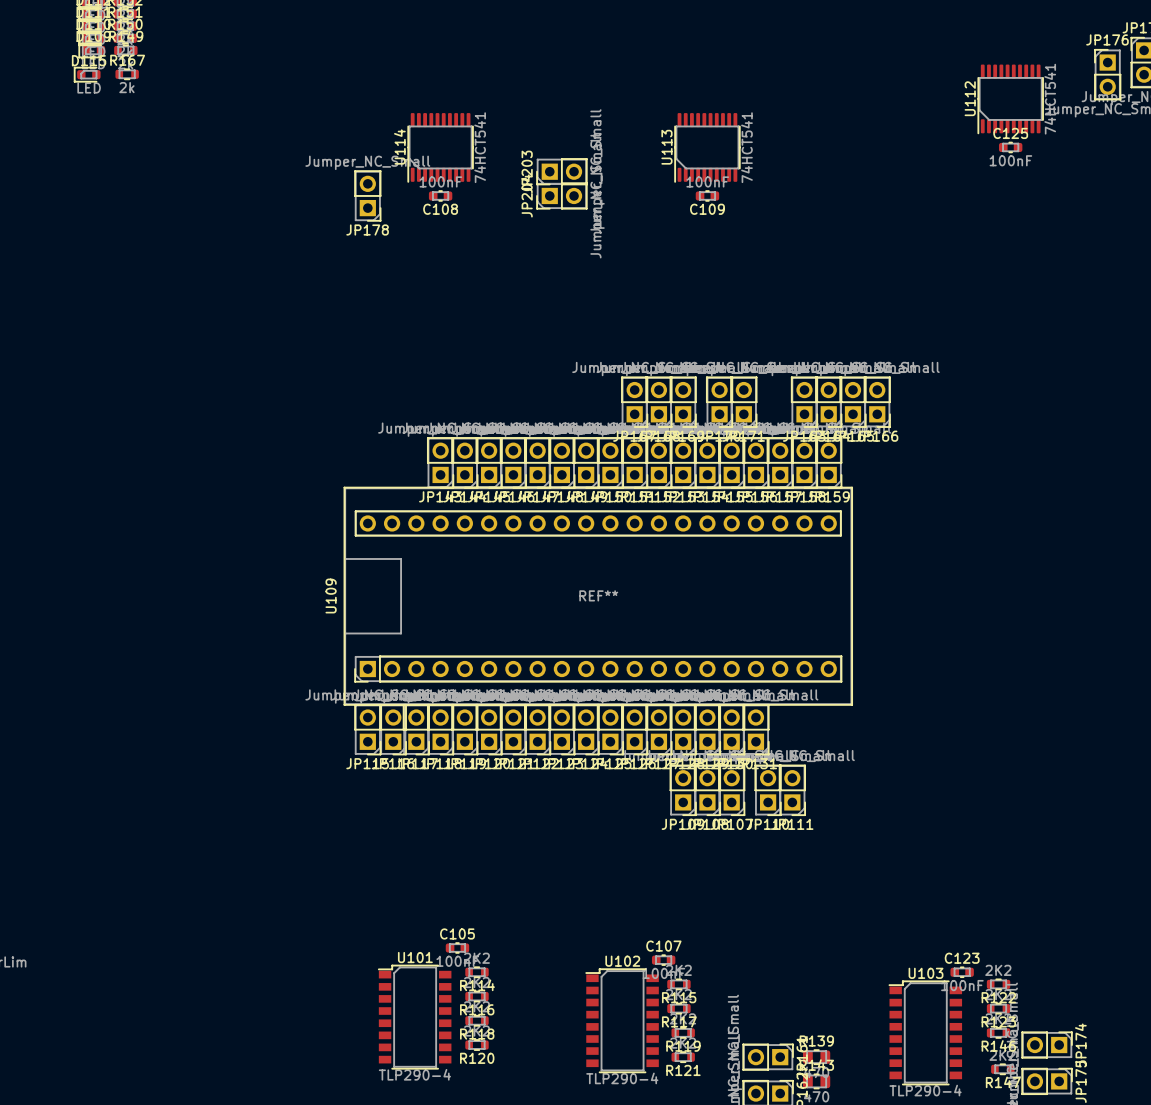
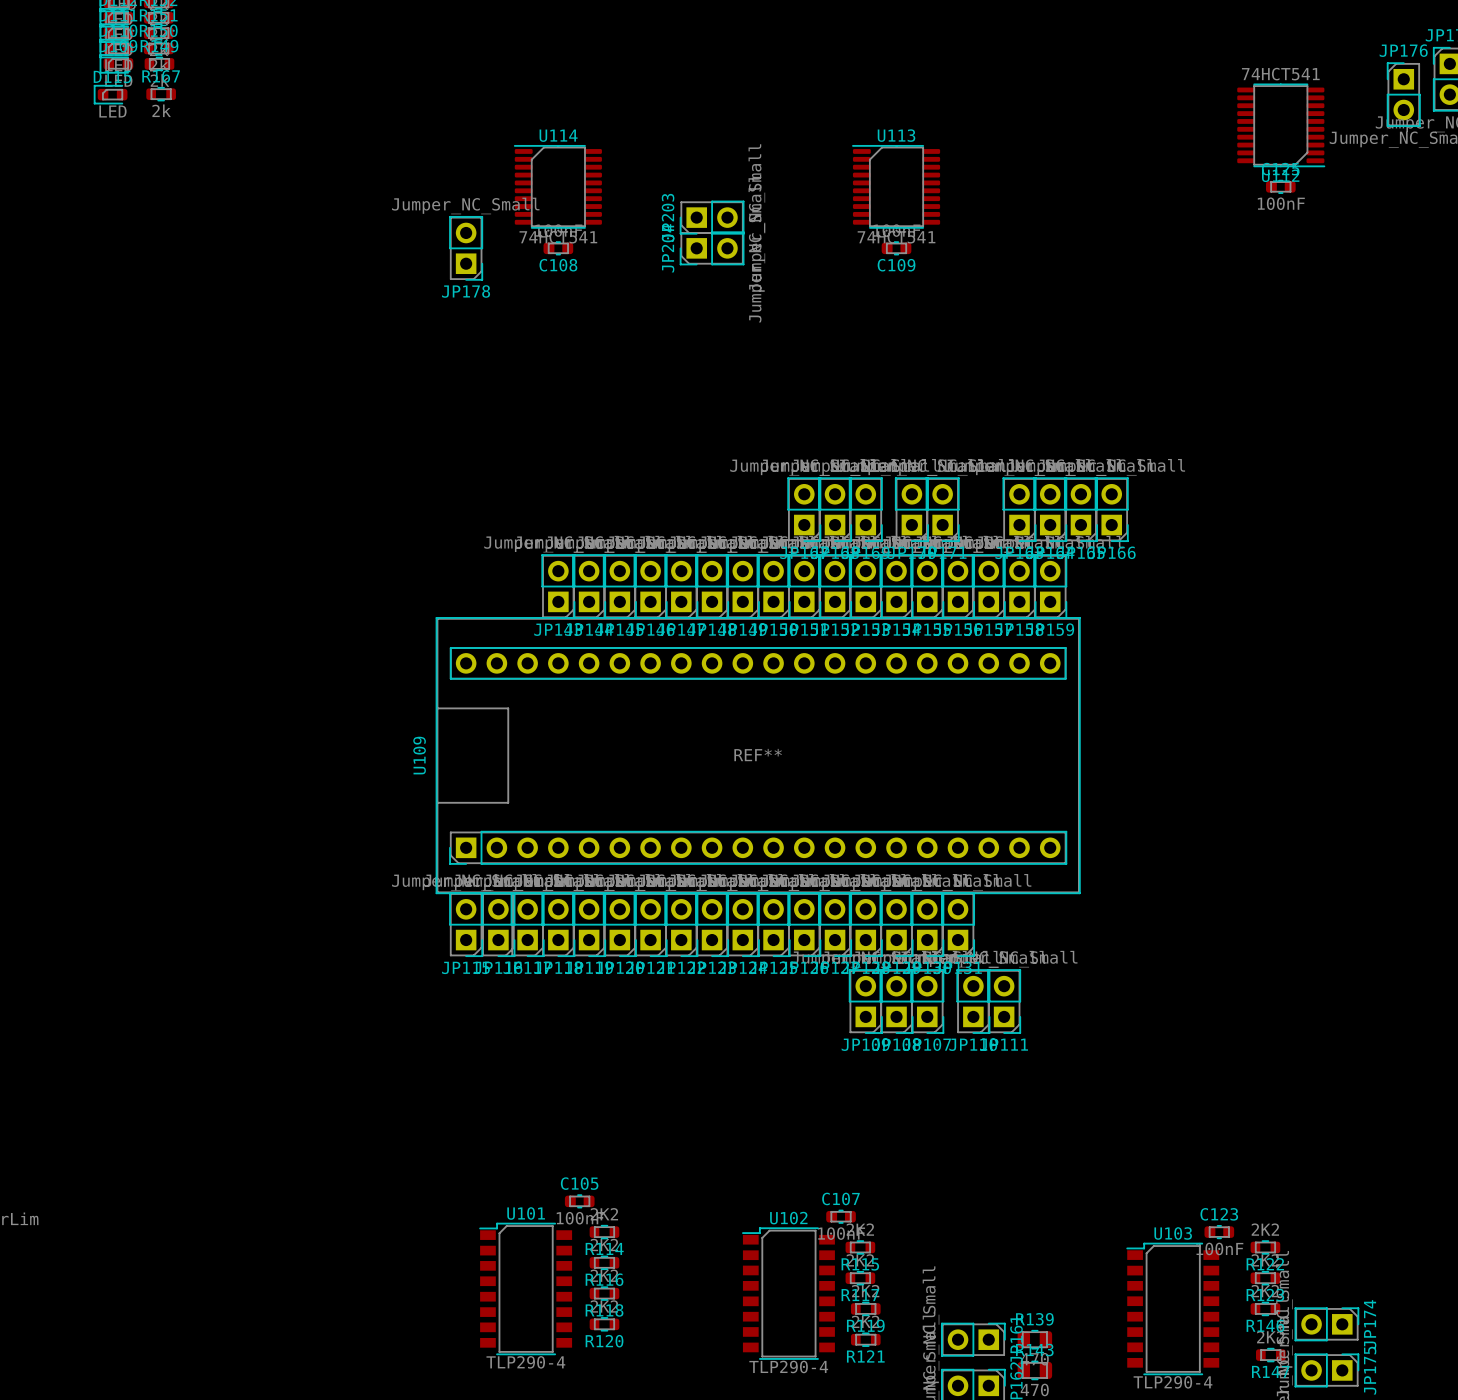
U112 rotation: 0° (1010, 99) -> 90° counterclockwise (1281, 125)
U114 rotation: 0° (440, 147) -> 90° clockwise (558, 186)
U113 rotation: 0° (707, 147) -> 90° clockwise (896, 186)

